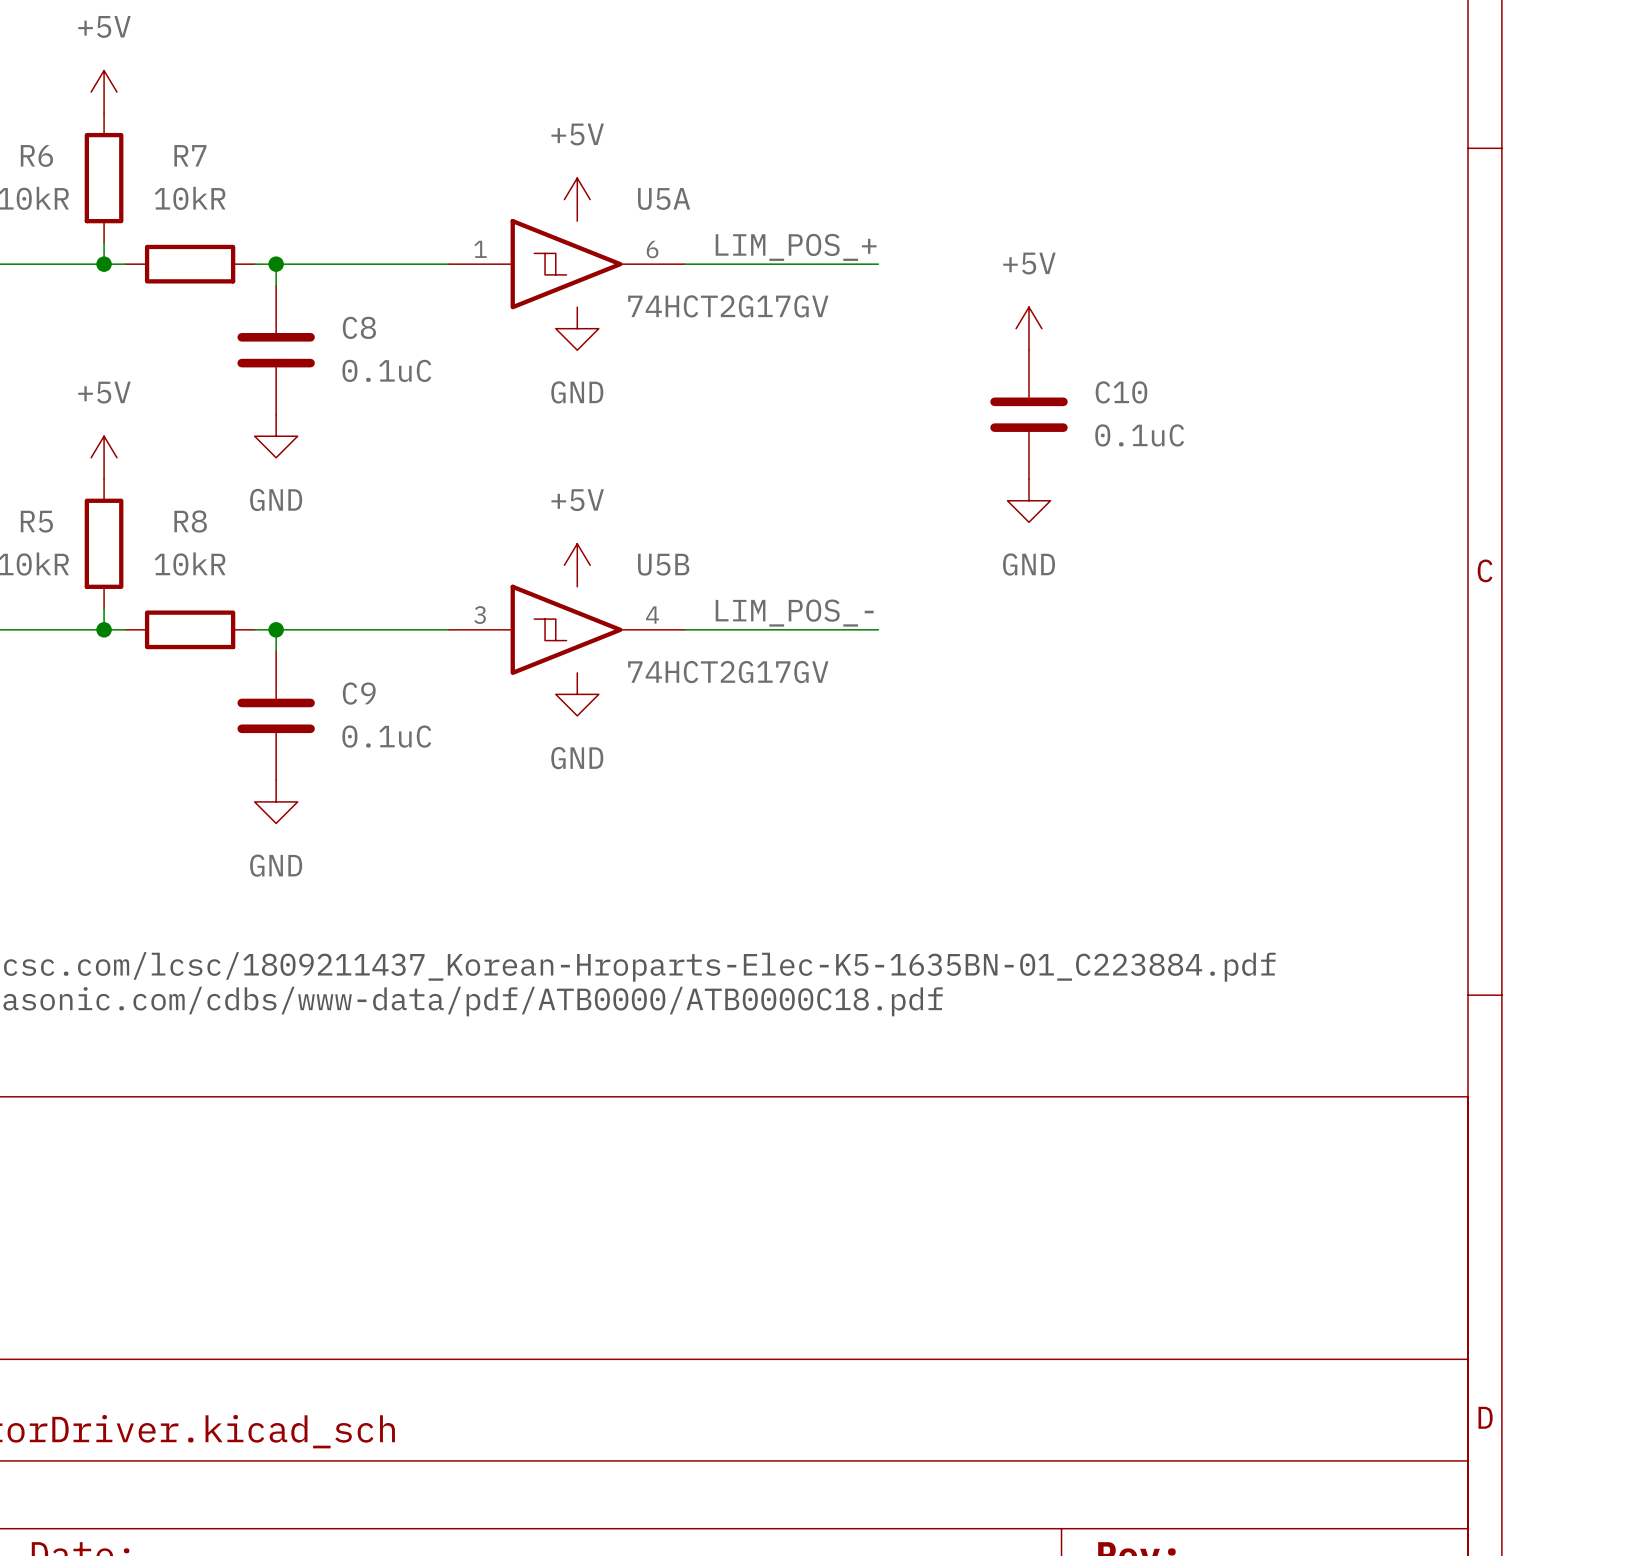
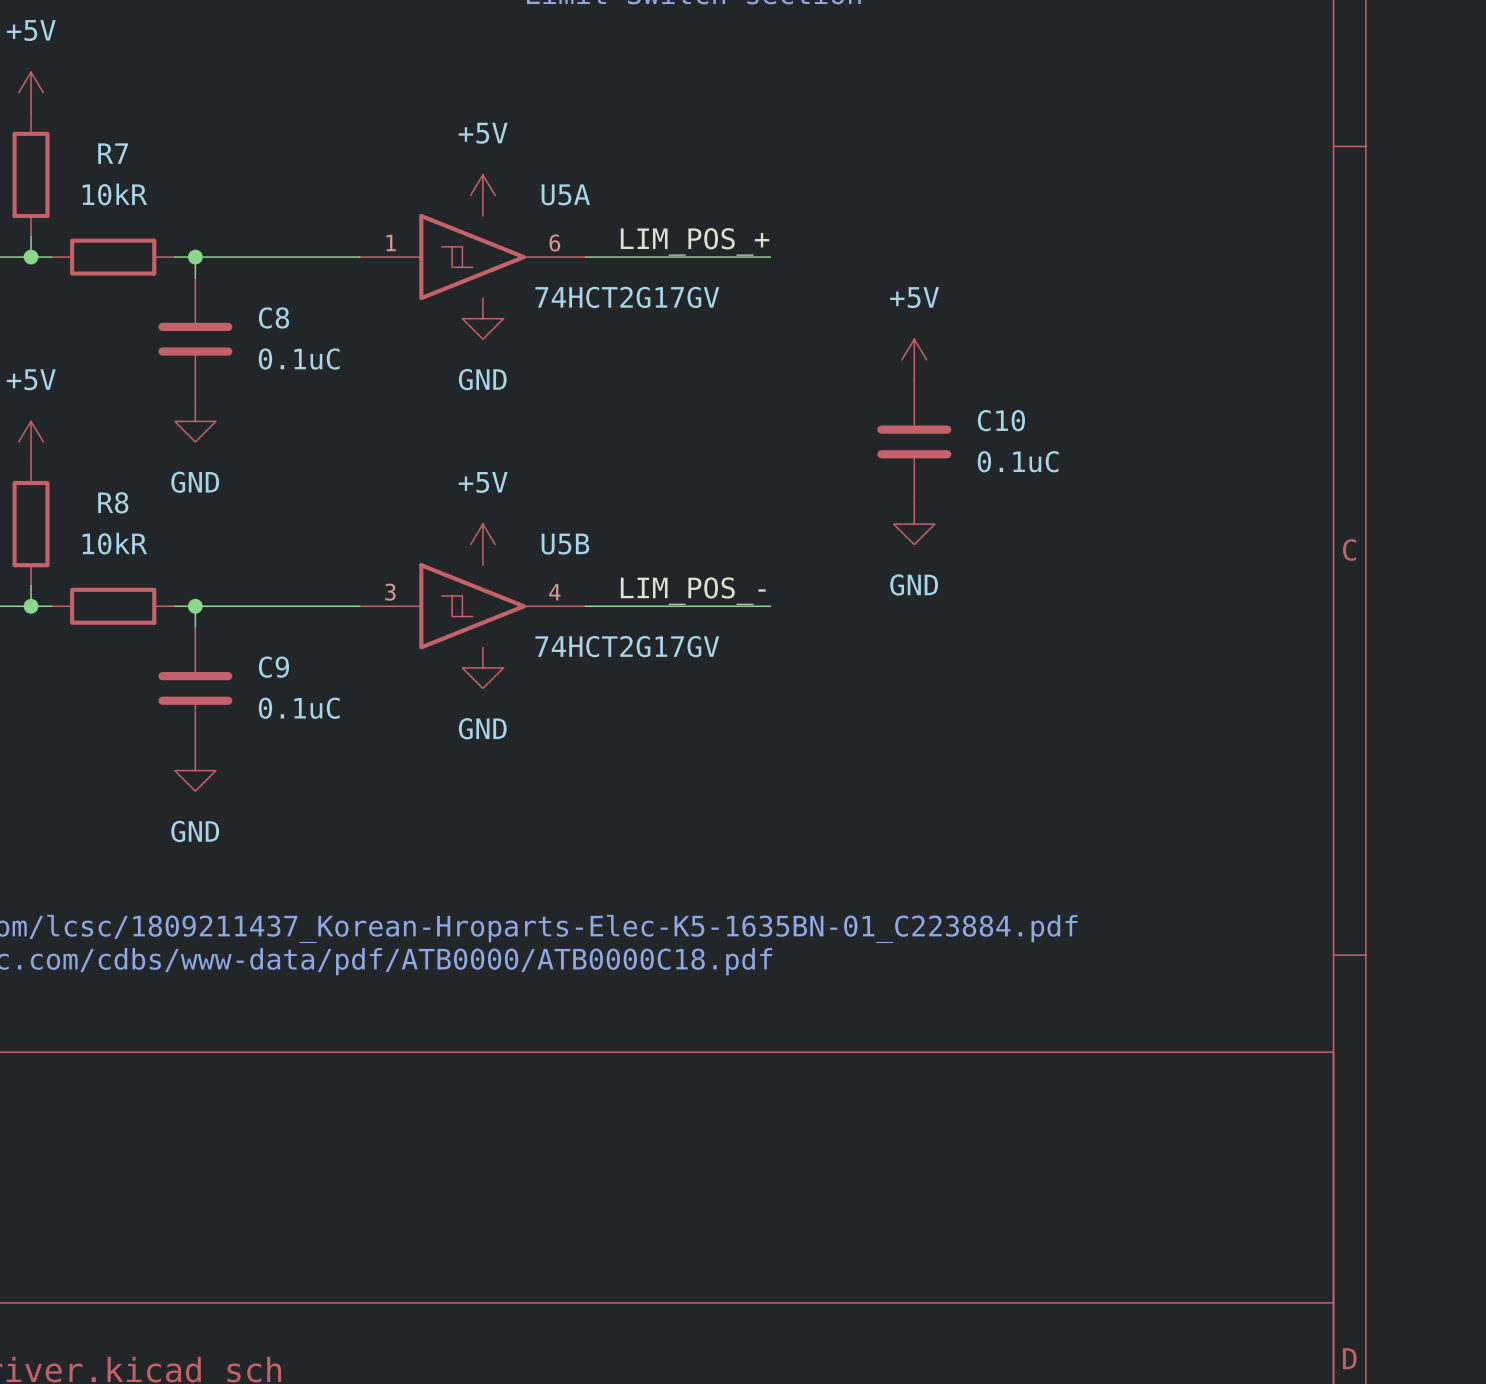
power symbol position: +5V (1029, 328) -> +5V (914, 359)
C10 position: (1029, 414) -> (914, 441)
power symbol position: GND (1029, 500) -> GND (914, 524)

